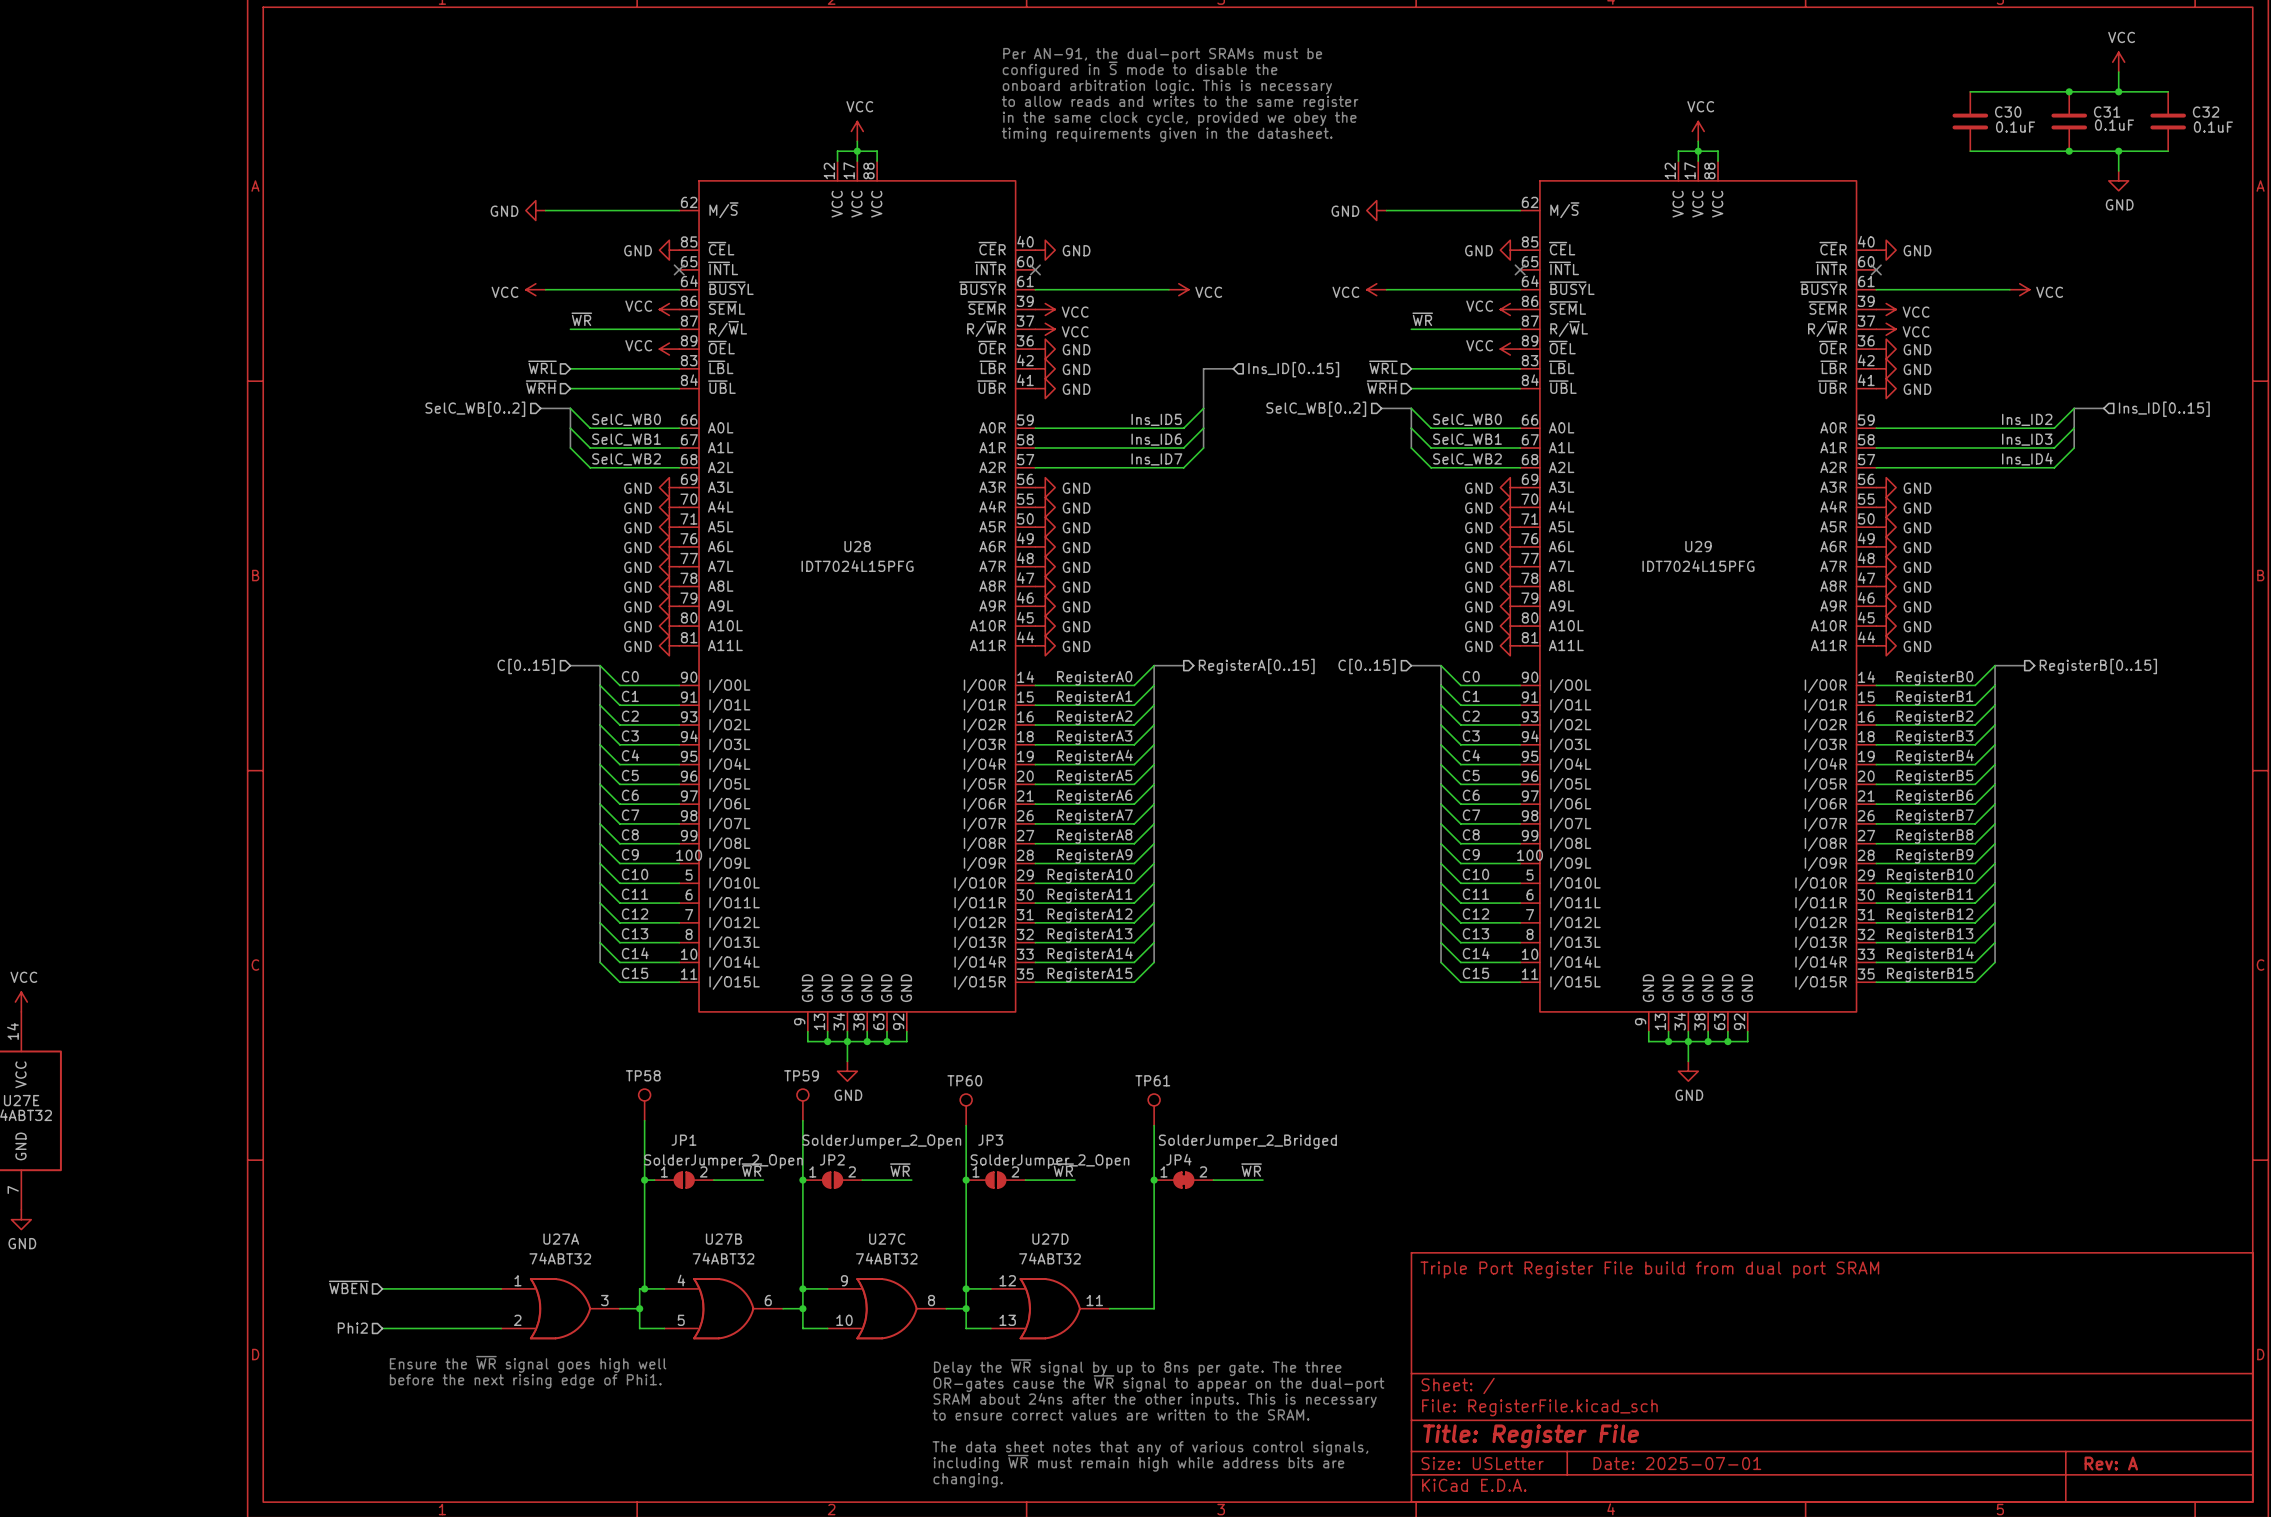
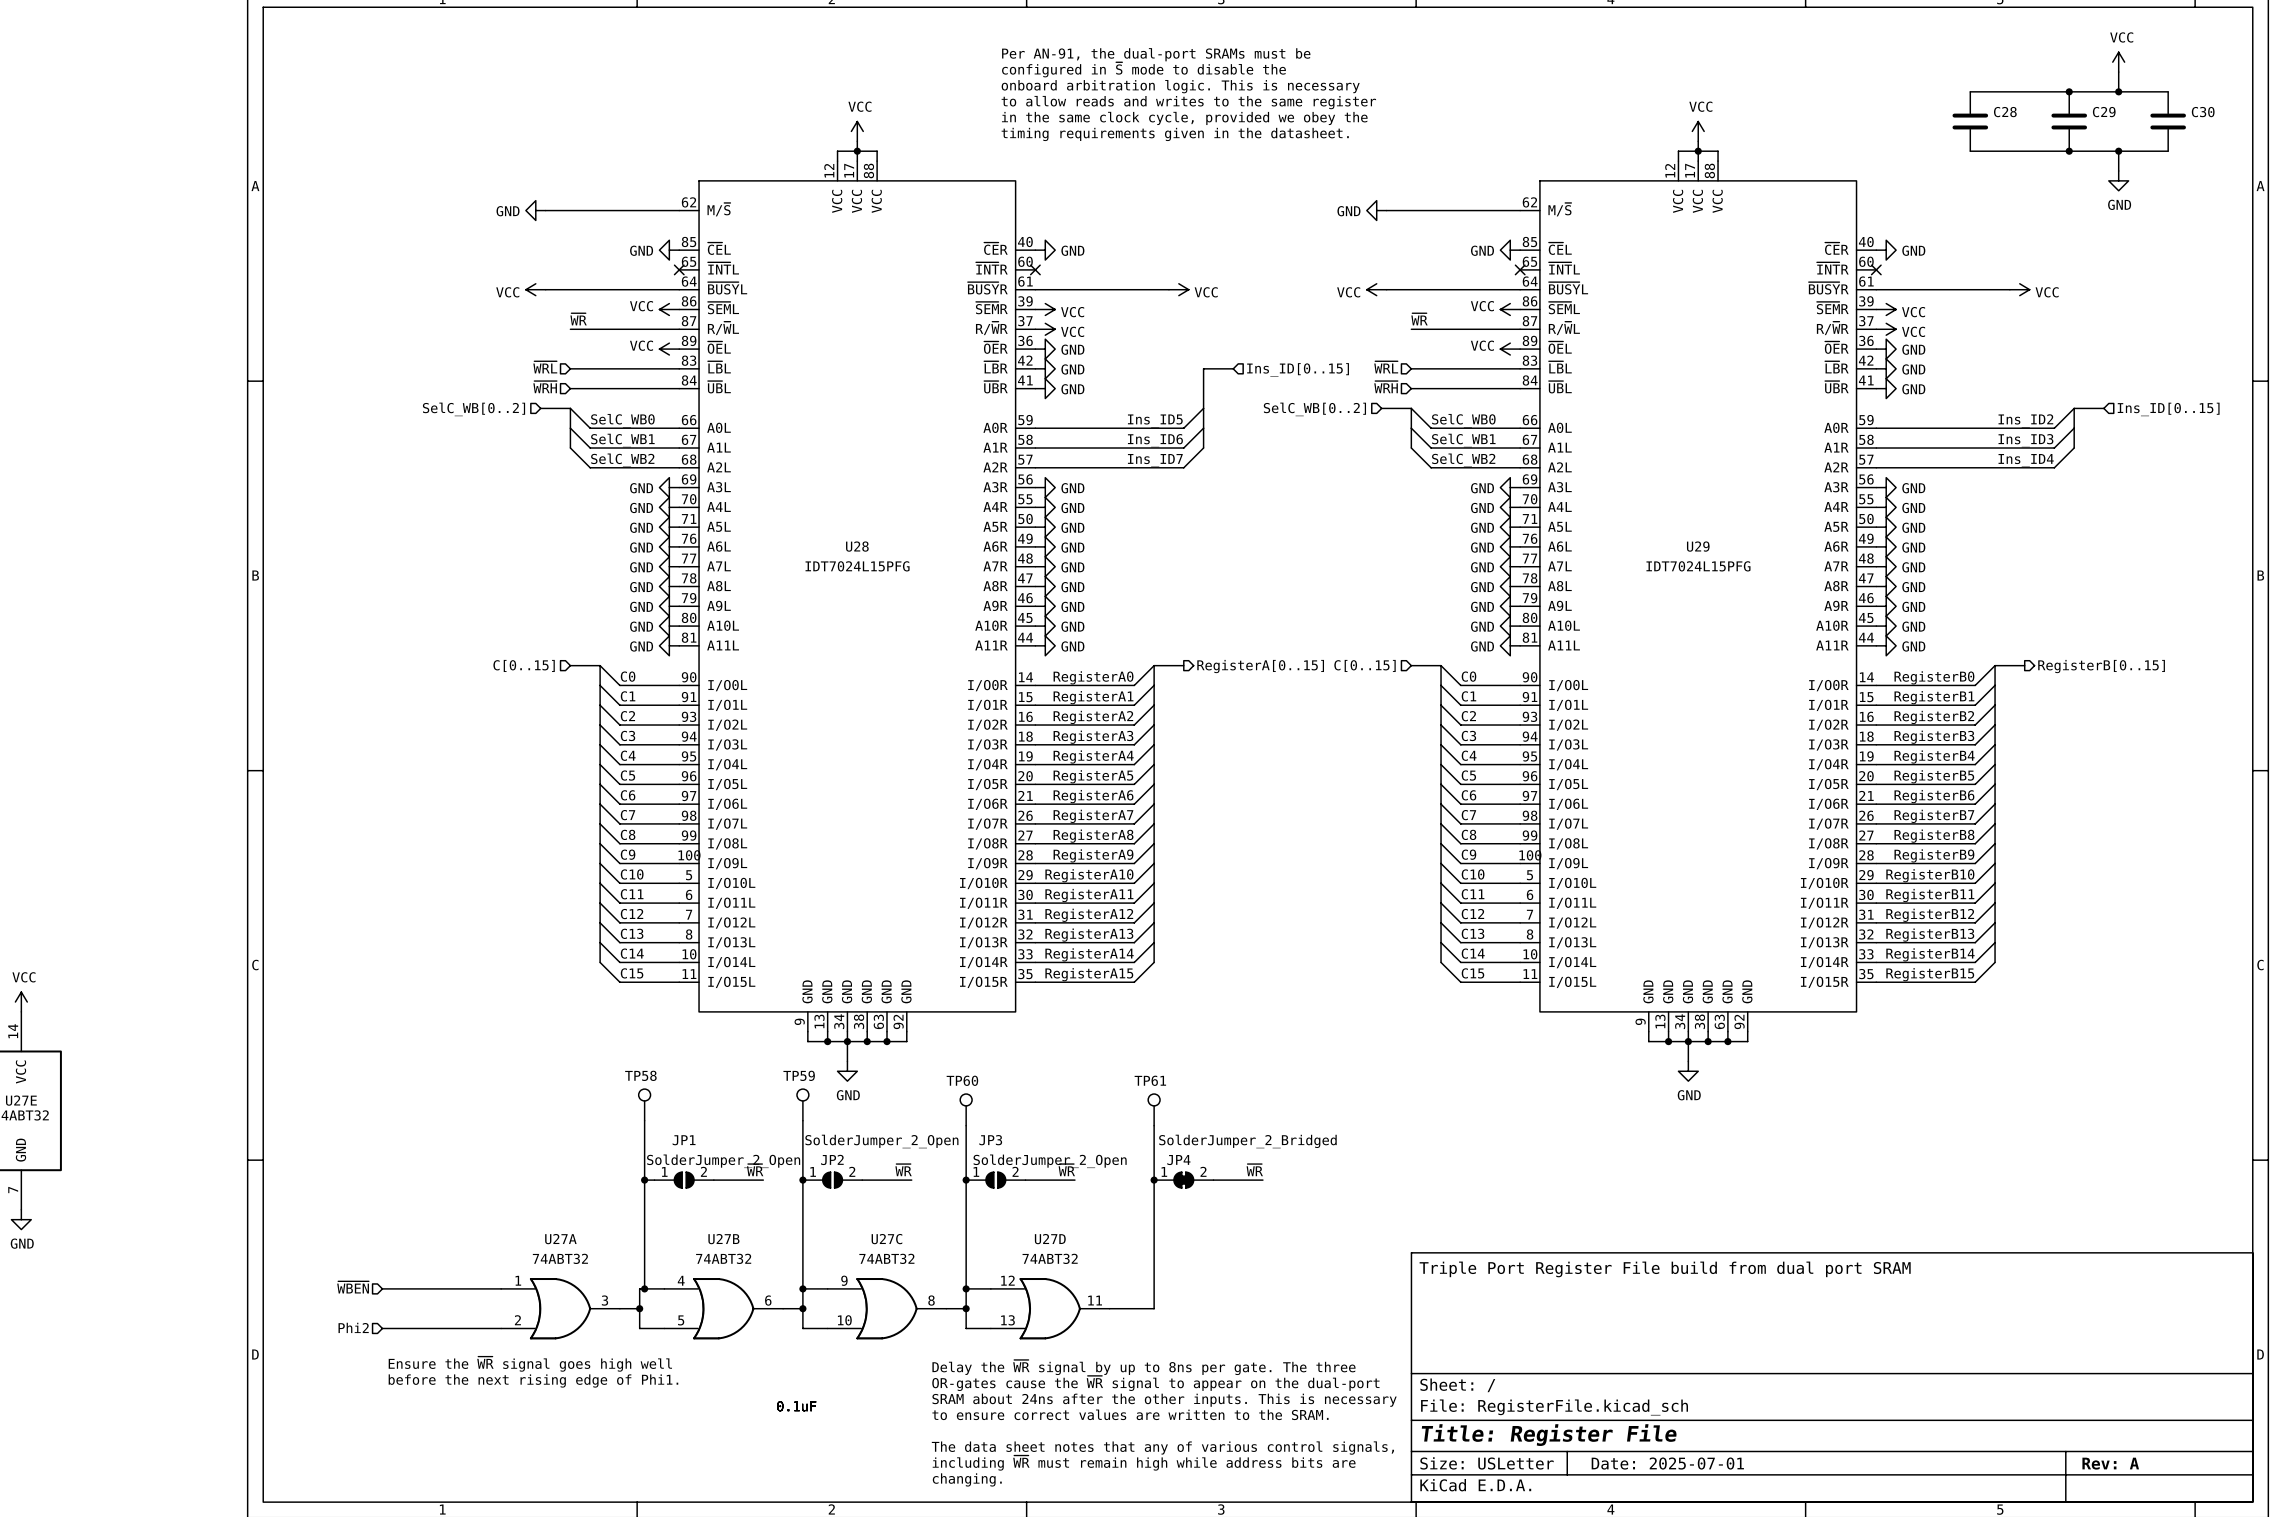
C30 name: C30 (2008, 112) -> C28 (2005, 112)
C31 name: C31 (2107, 112) -> C29 (2104, 112)
C32 name: C32 (2206, 112) -> C30 (2203, 112)
C31 value position: 0.1uF (2114, 125) -> 0.1uF (796, 1406)
C30 value position: 0.1uF (2015, 127) -> 0.1uF (796, 1406)
C32 value position: 0.1uF (2213, 127) -> 0.1uF (796, 1406)

